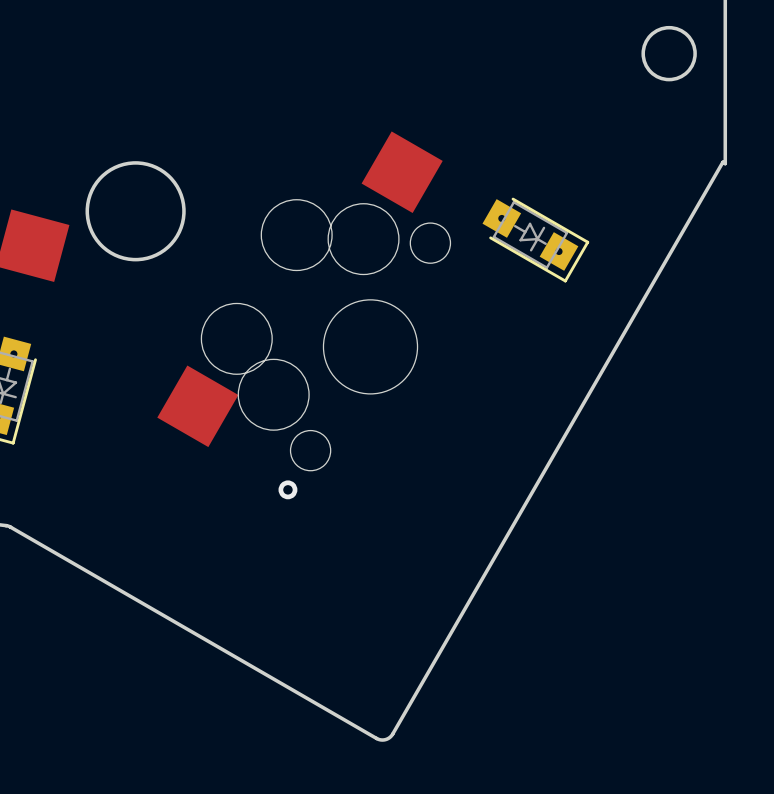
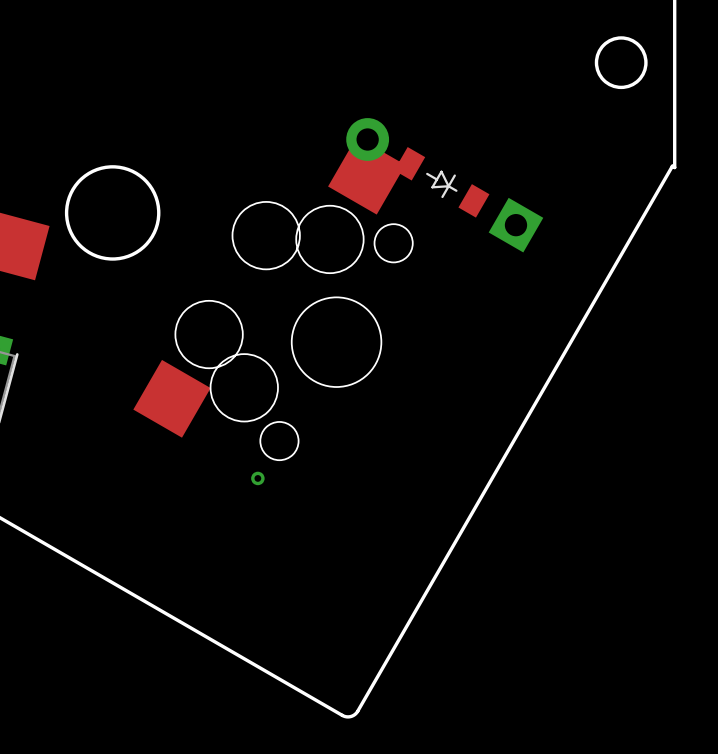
part: none -> (444, 185)
part: (535, 240) -> none
part: none -> (257, 478)
via: (287, 489) -> none

